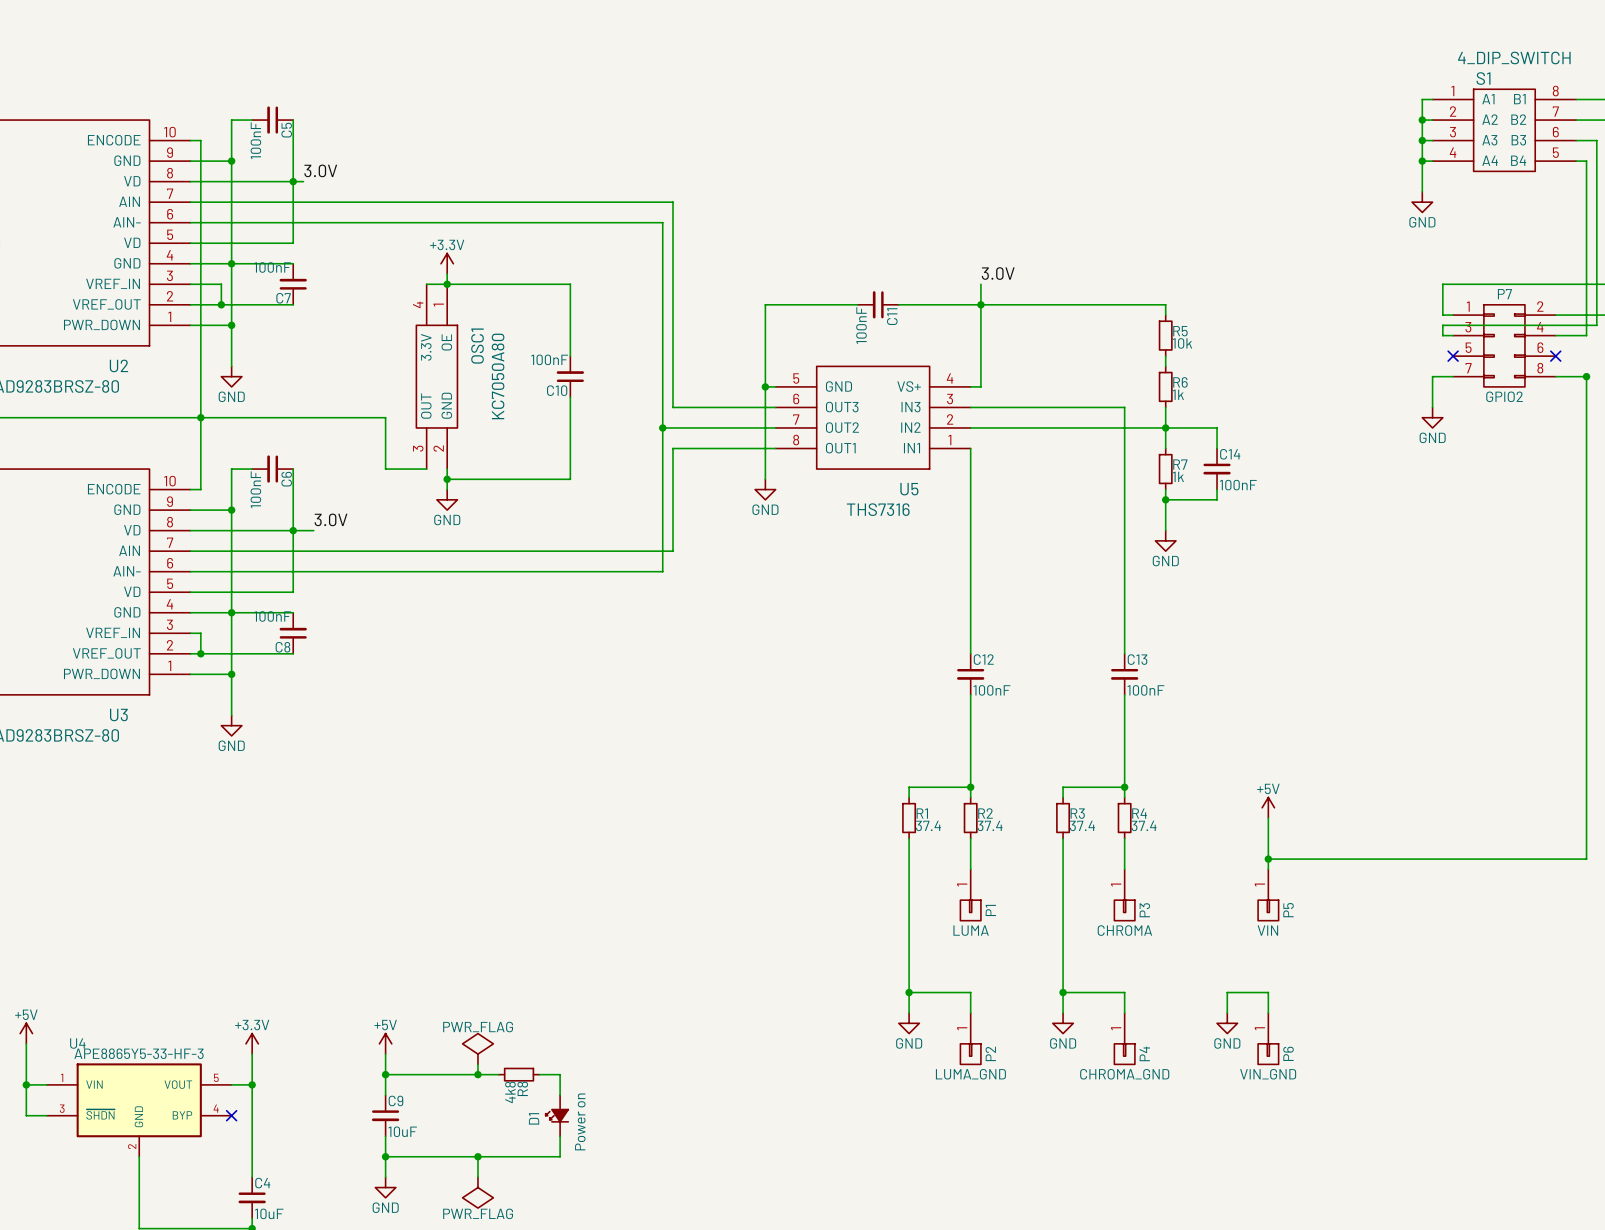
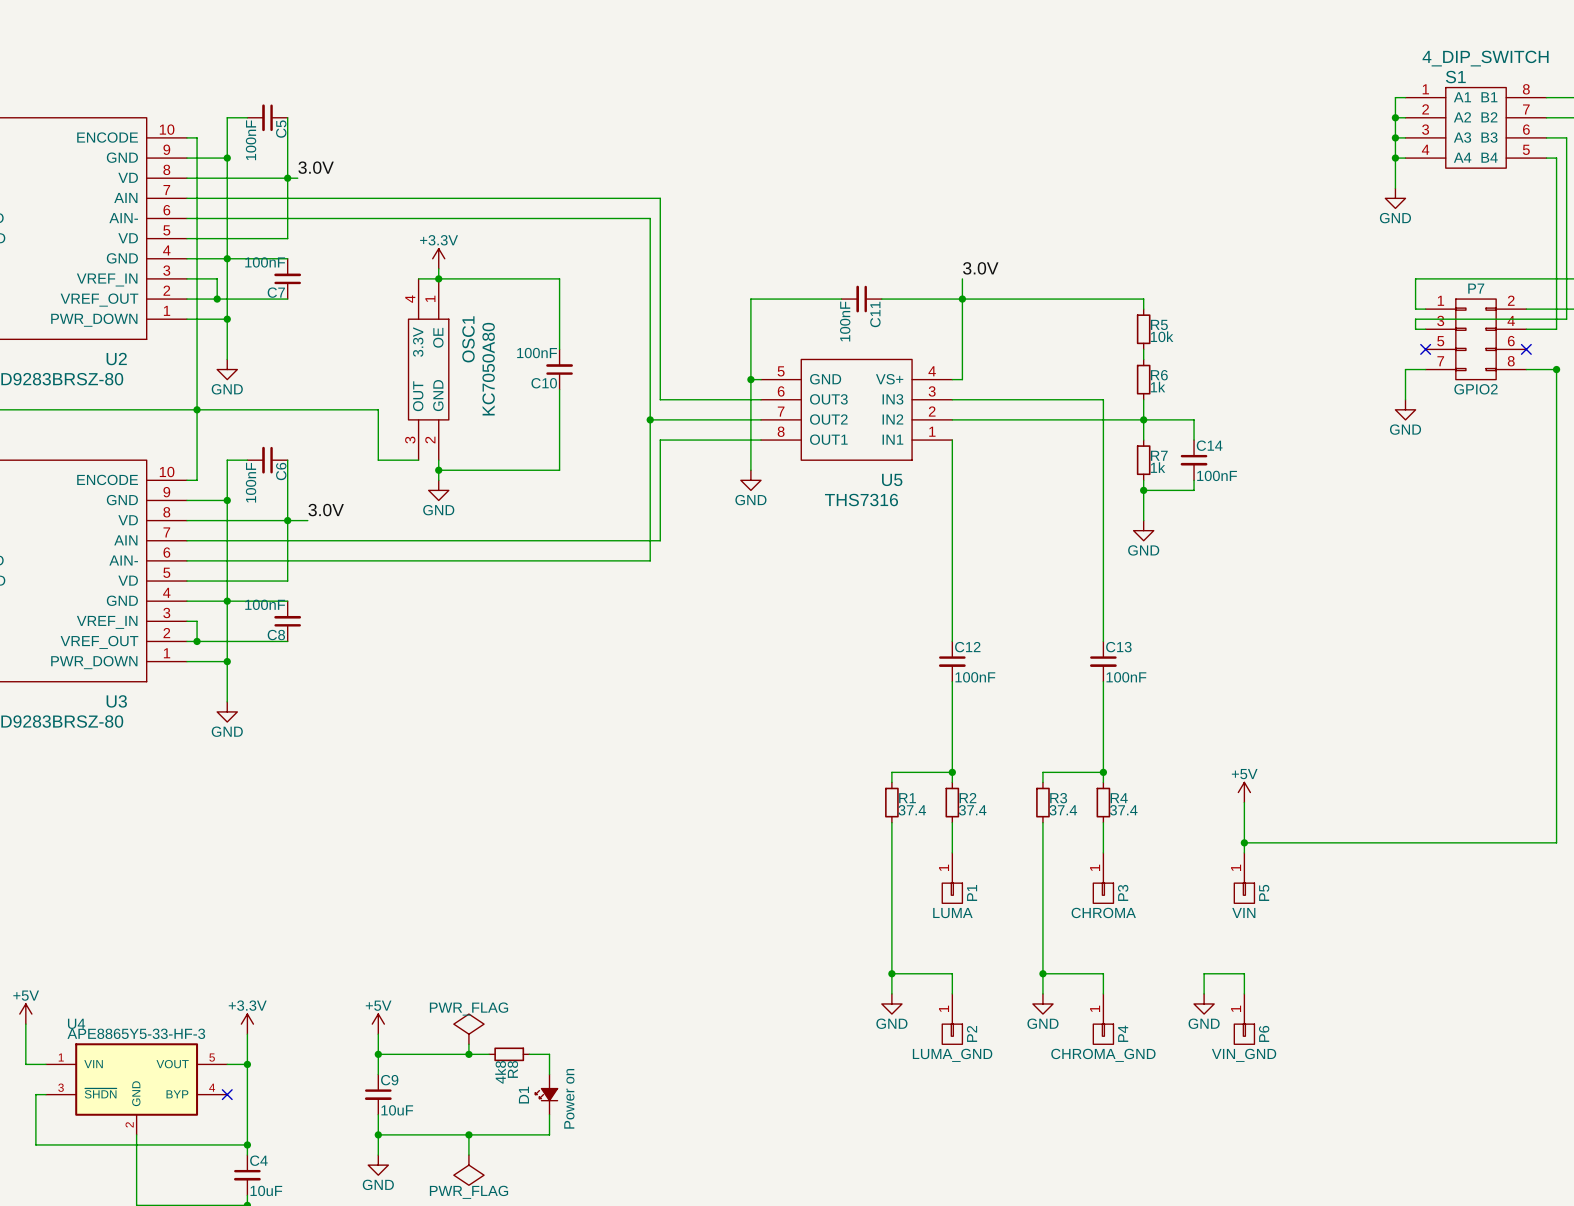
wire: (26, 1084) (26, 1115) (36, 1115) -> (247, 1144) (35, 1144) (35, 1094)
junction: (26, 1084) -> none
junction: none -> (247, 1144)

